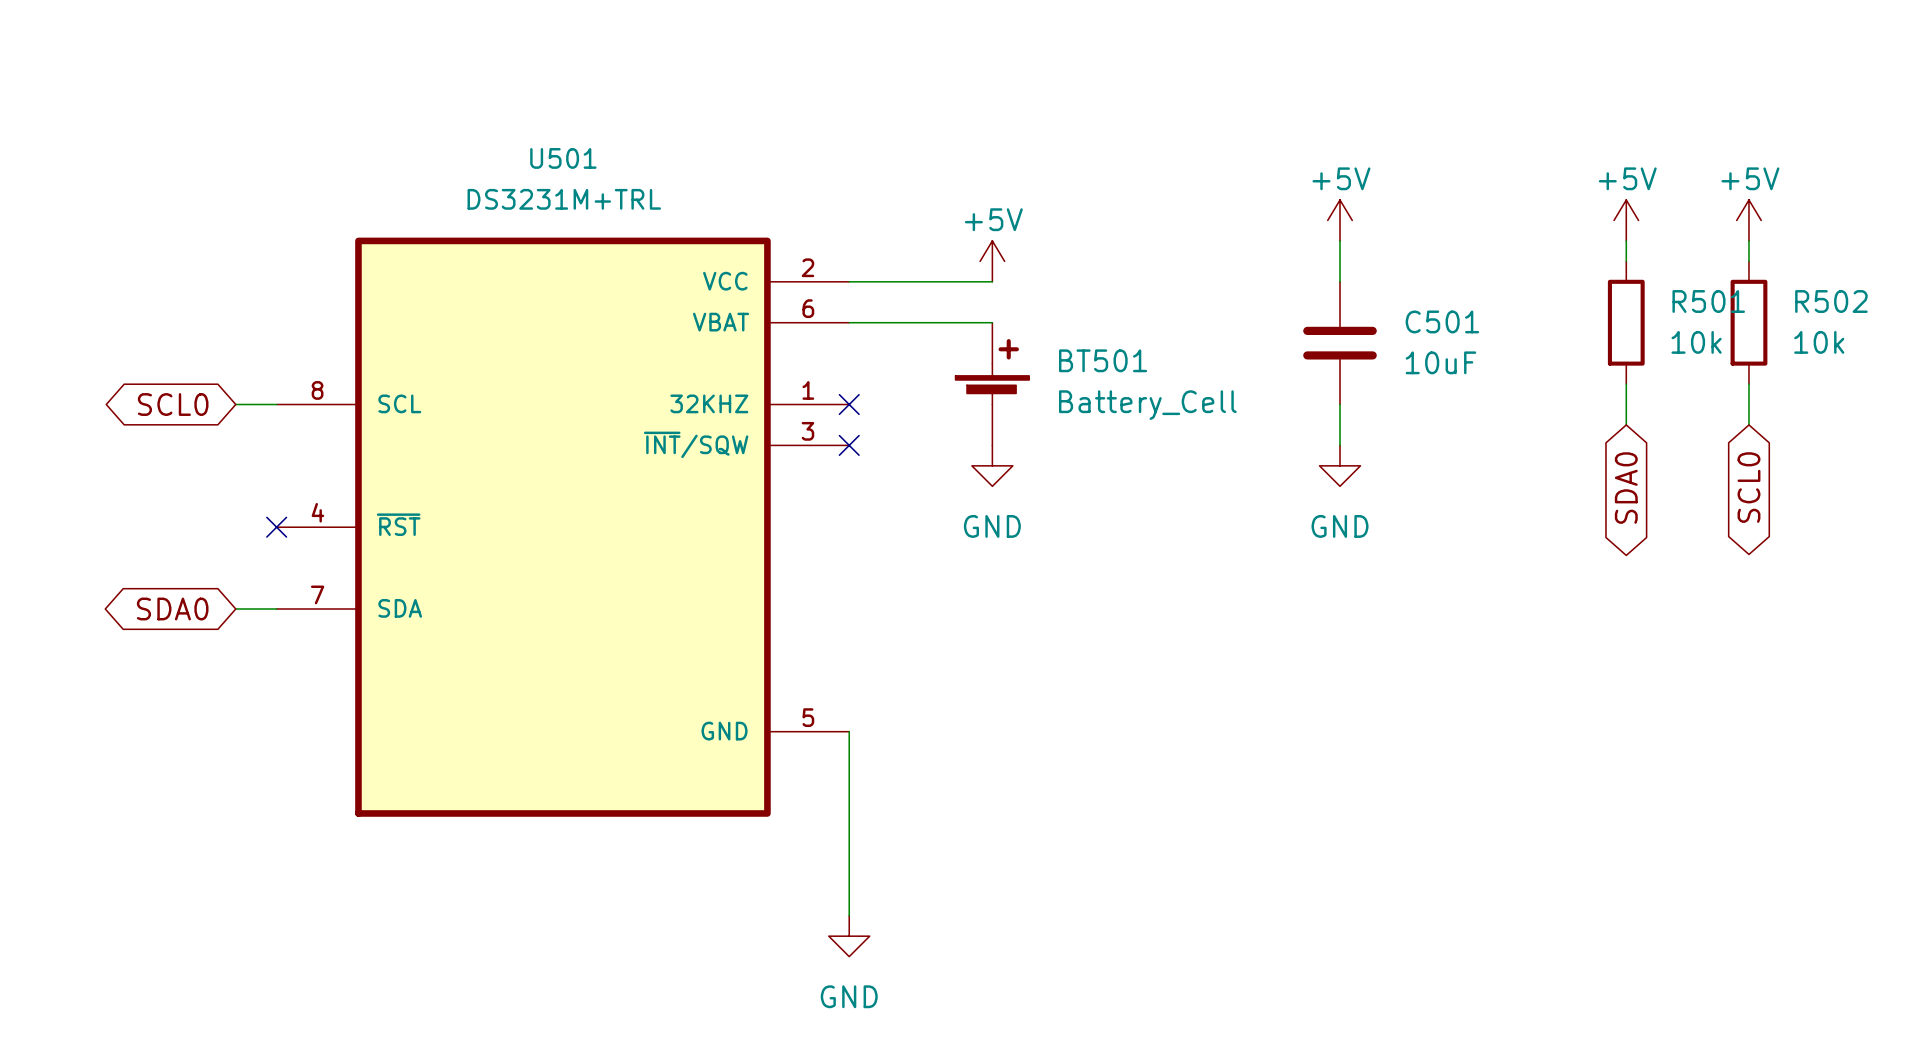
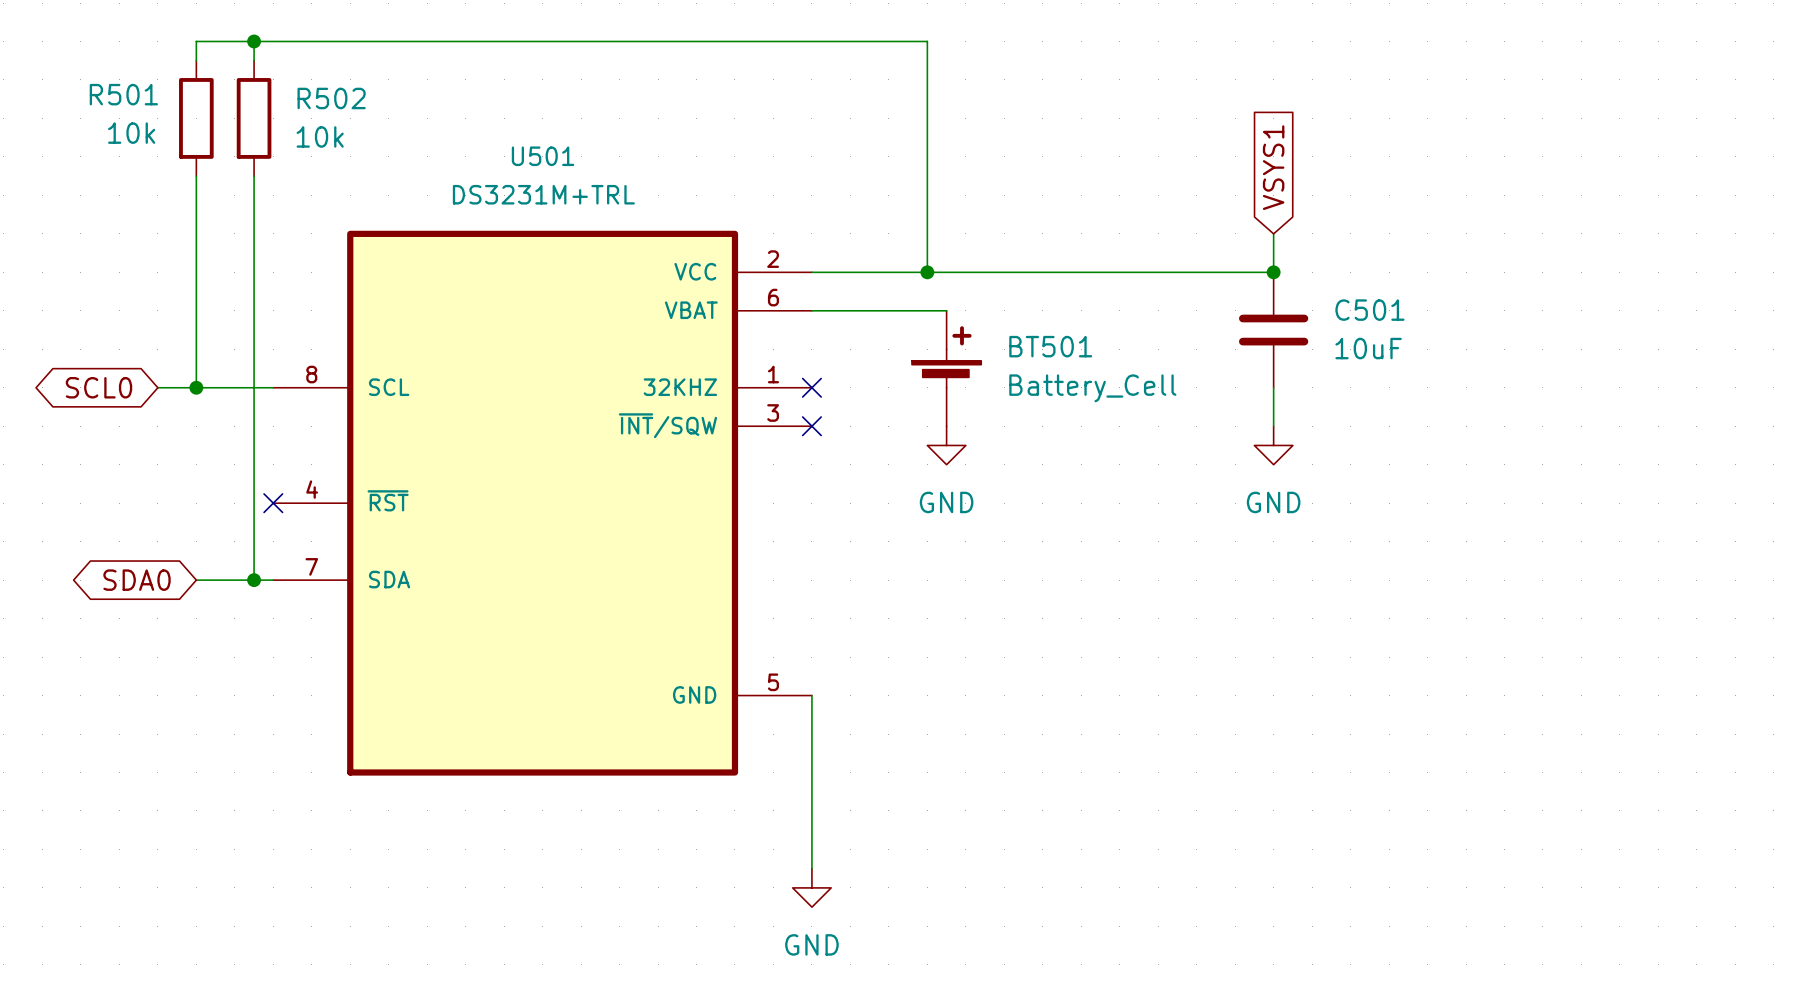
wire: none -> (254, 41) (254, 60)
junction: none -> (254, 41)
wire: none -> (196, 60) (196, 41) (927, 41) (927, 272)
global label: none -> VSYS1 (1273, 167)
wire: none -> (196, 176) (196, 387)
wire: none -> (254, 176) (254, 580)
power symbol: +5V (1340, 220) -> none
power symbol: +5V (1626, 220) -> none
power symbol: +5V (1748, 220) -> none
wire: (1626, 240) (1626, 261) -> none
wire: (1748, 240) (1748, 261) -> none
power symbol: +5V (992, 261) -> none
junction: none -> (927, 272)
wire: none -> (946, 272) (1273, 272)
junction: none -> (1273, 272)
R501 name position: R501 (1708, 301) -> R501 (123, 94)
R501 position: (1626, 322) -> (196, 118)
R502 position: (1748, 322) -> (254, 118)
R501 value position: 10k (1696, 342) -> 10k (131, 133)
wire: (1626, 384) (1626, 424) -> none
wire: (1748, 384) (1748, 424) -> none
wire: none -> (157, 387) (234, 387)
global label position: SCL0 (173, 404) -> SCL0 (98, 387)
junction: none -> (196, 387)
global label: SCL0 (1748, 487) -> none
global label: SDA0 (1626, 488) -> none
global label position: SDA0 (172, 609) -> SDA0 (137, 580)
wire: none -> (196, 580) (234, 580)
junction: none -> (254, 580)

